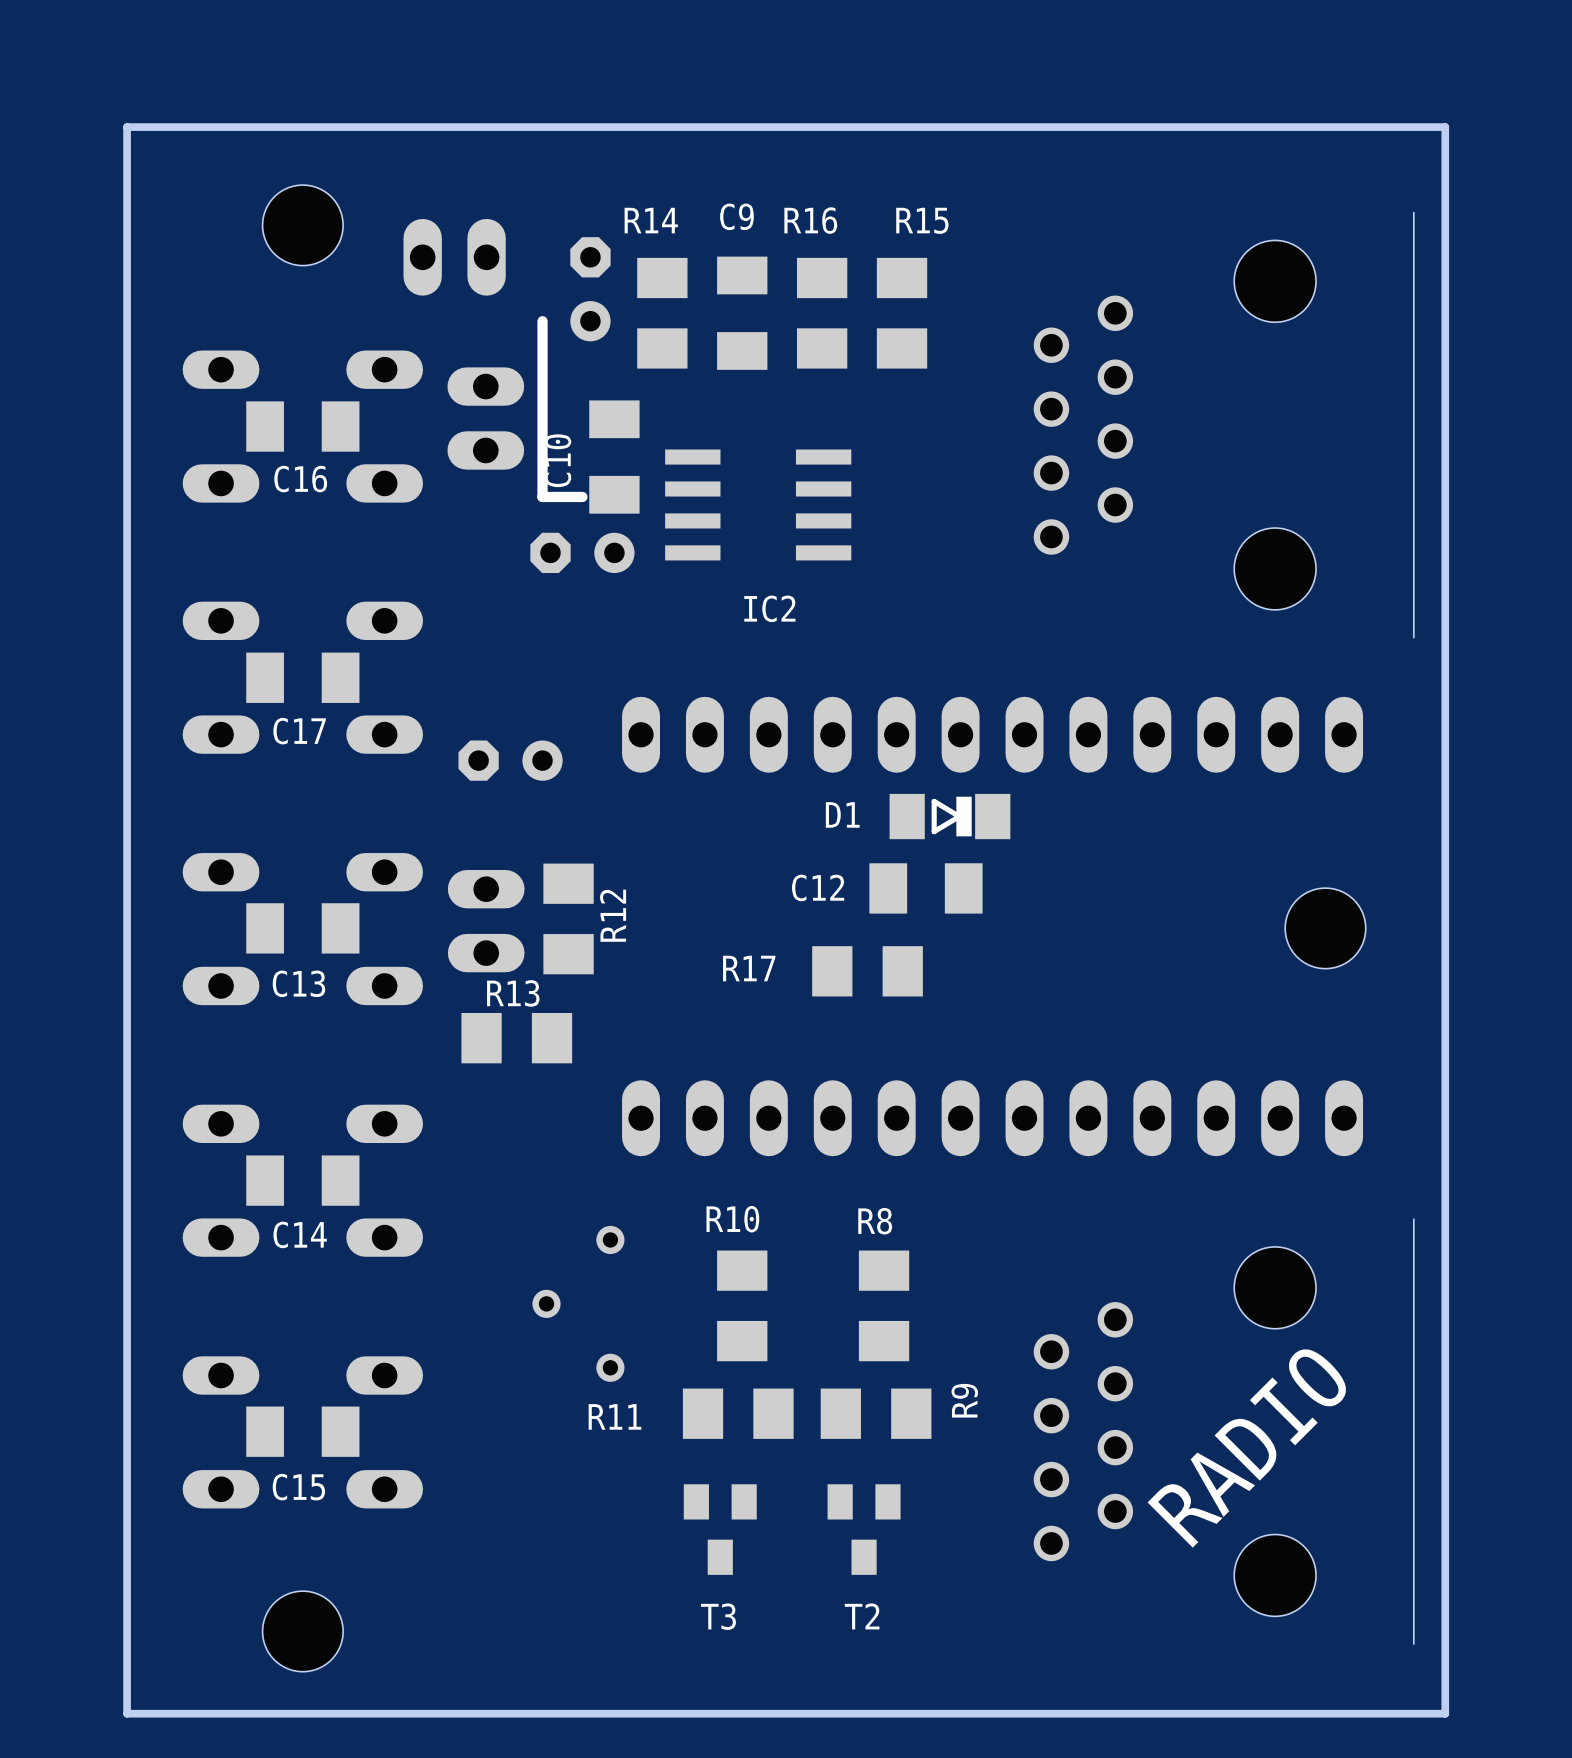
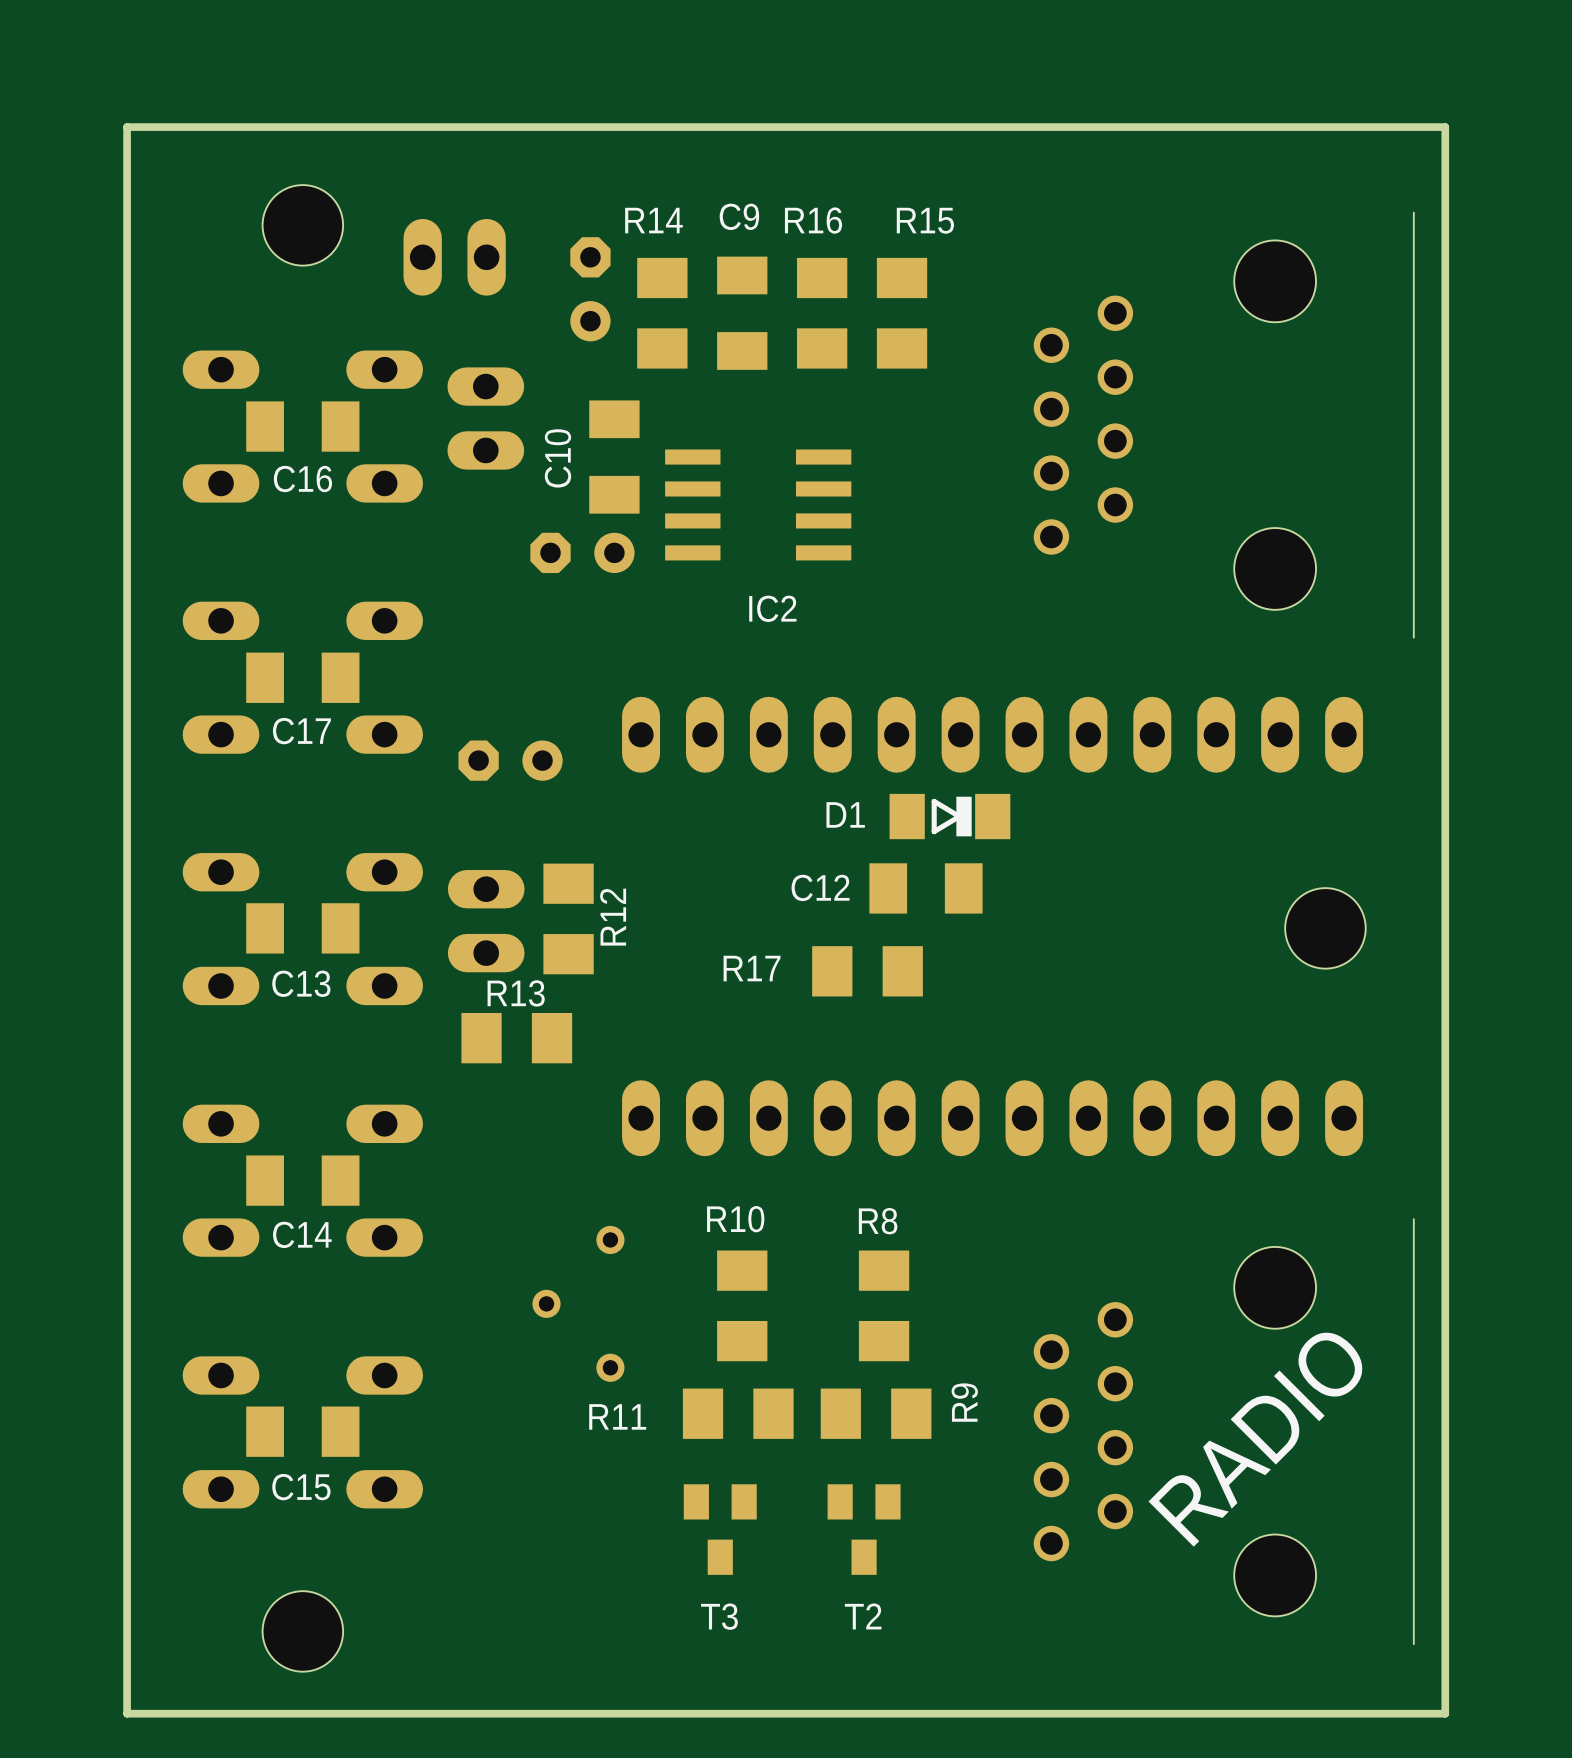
line: (542, 321) (542, 496) (582, 496) -> none

